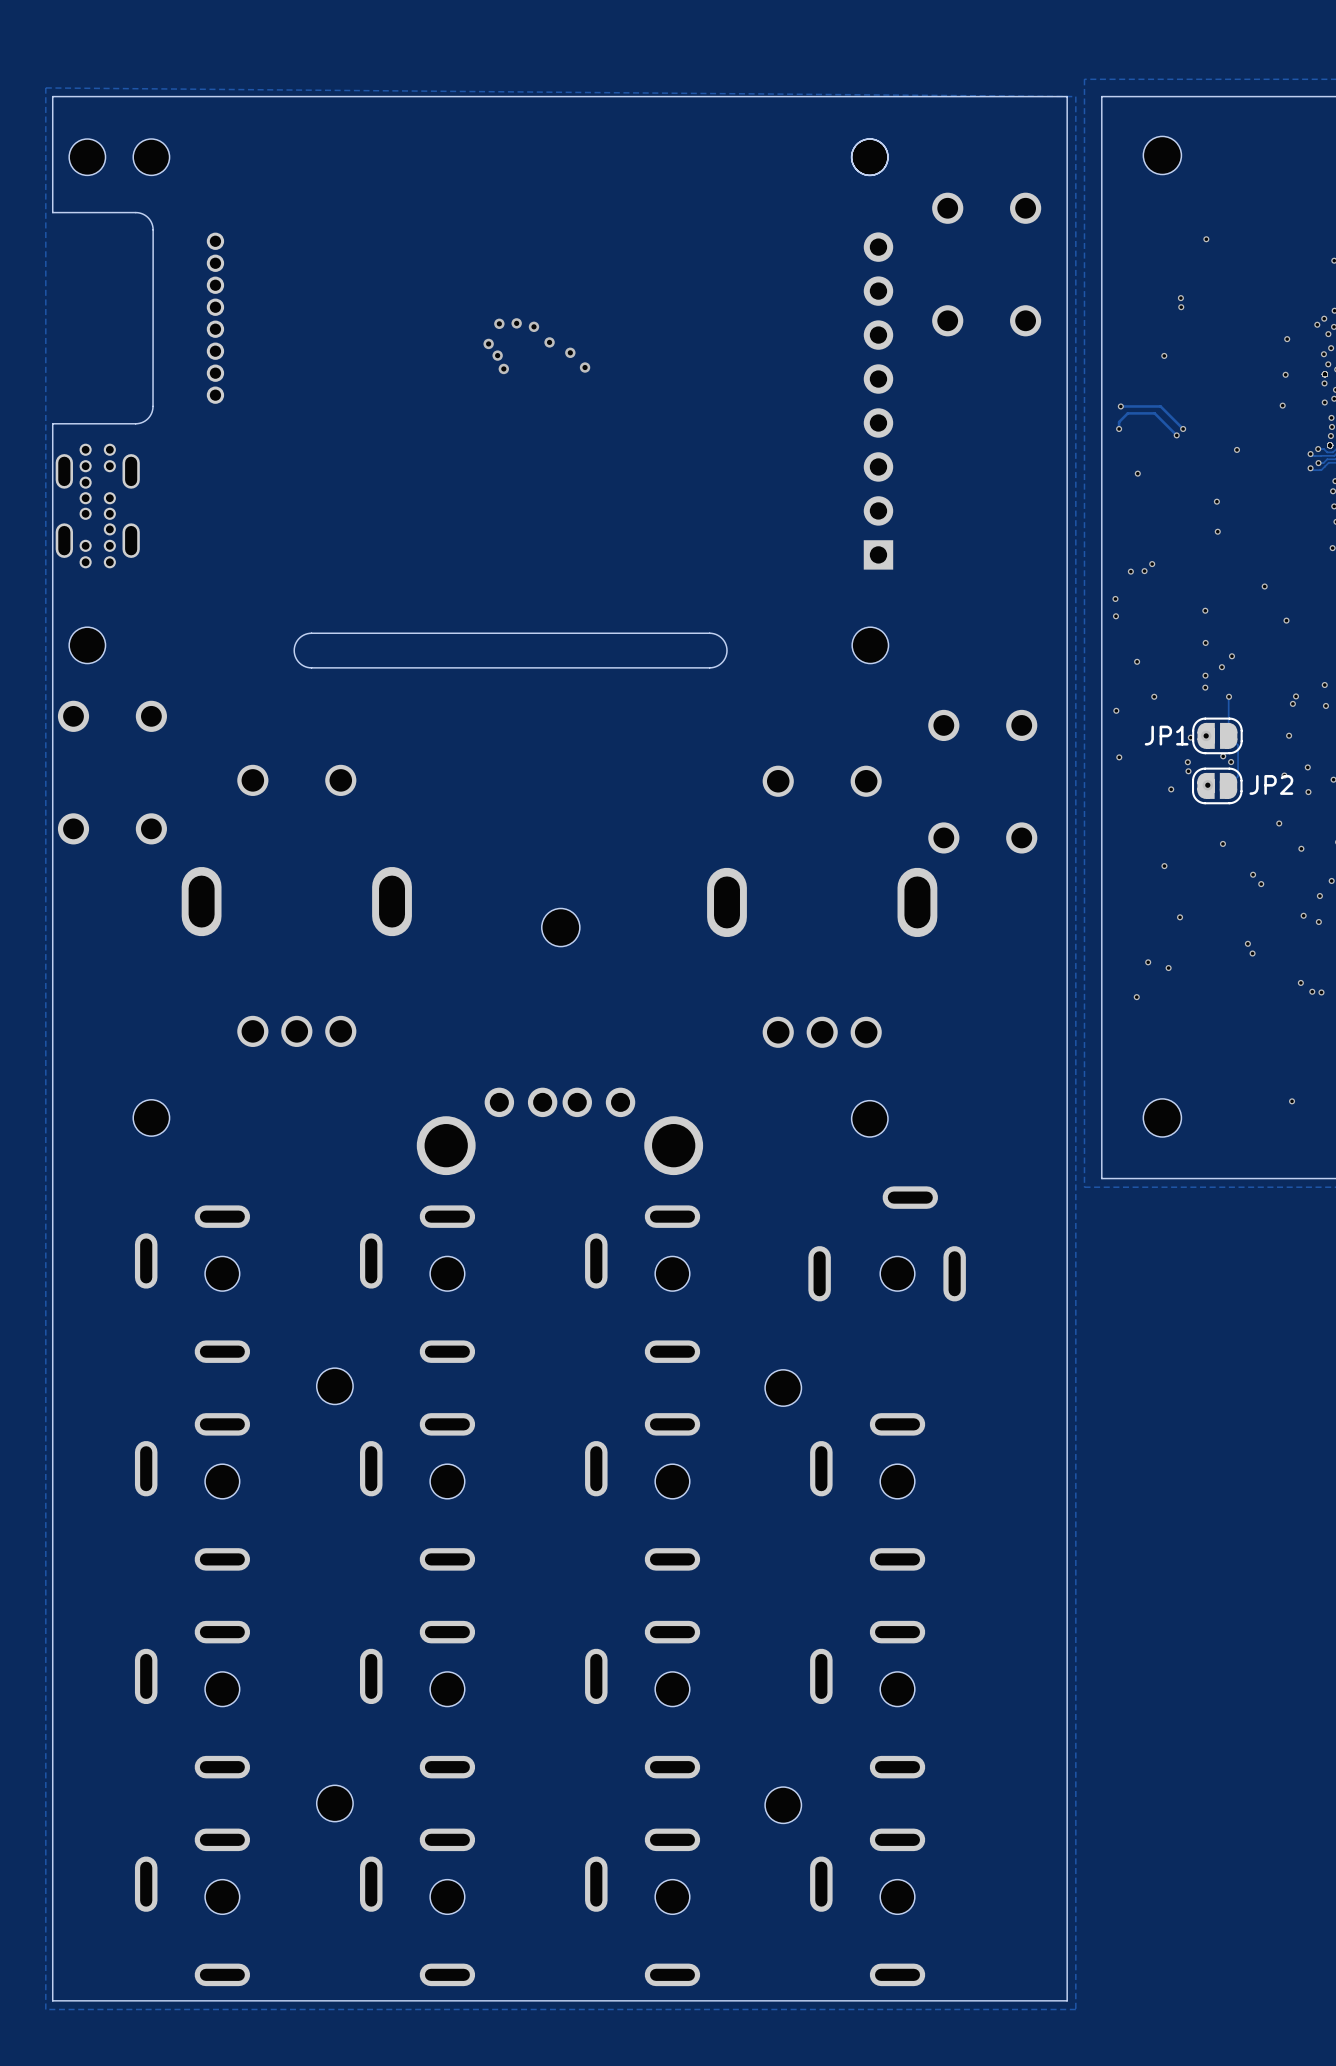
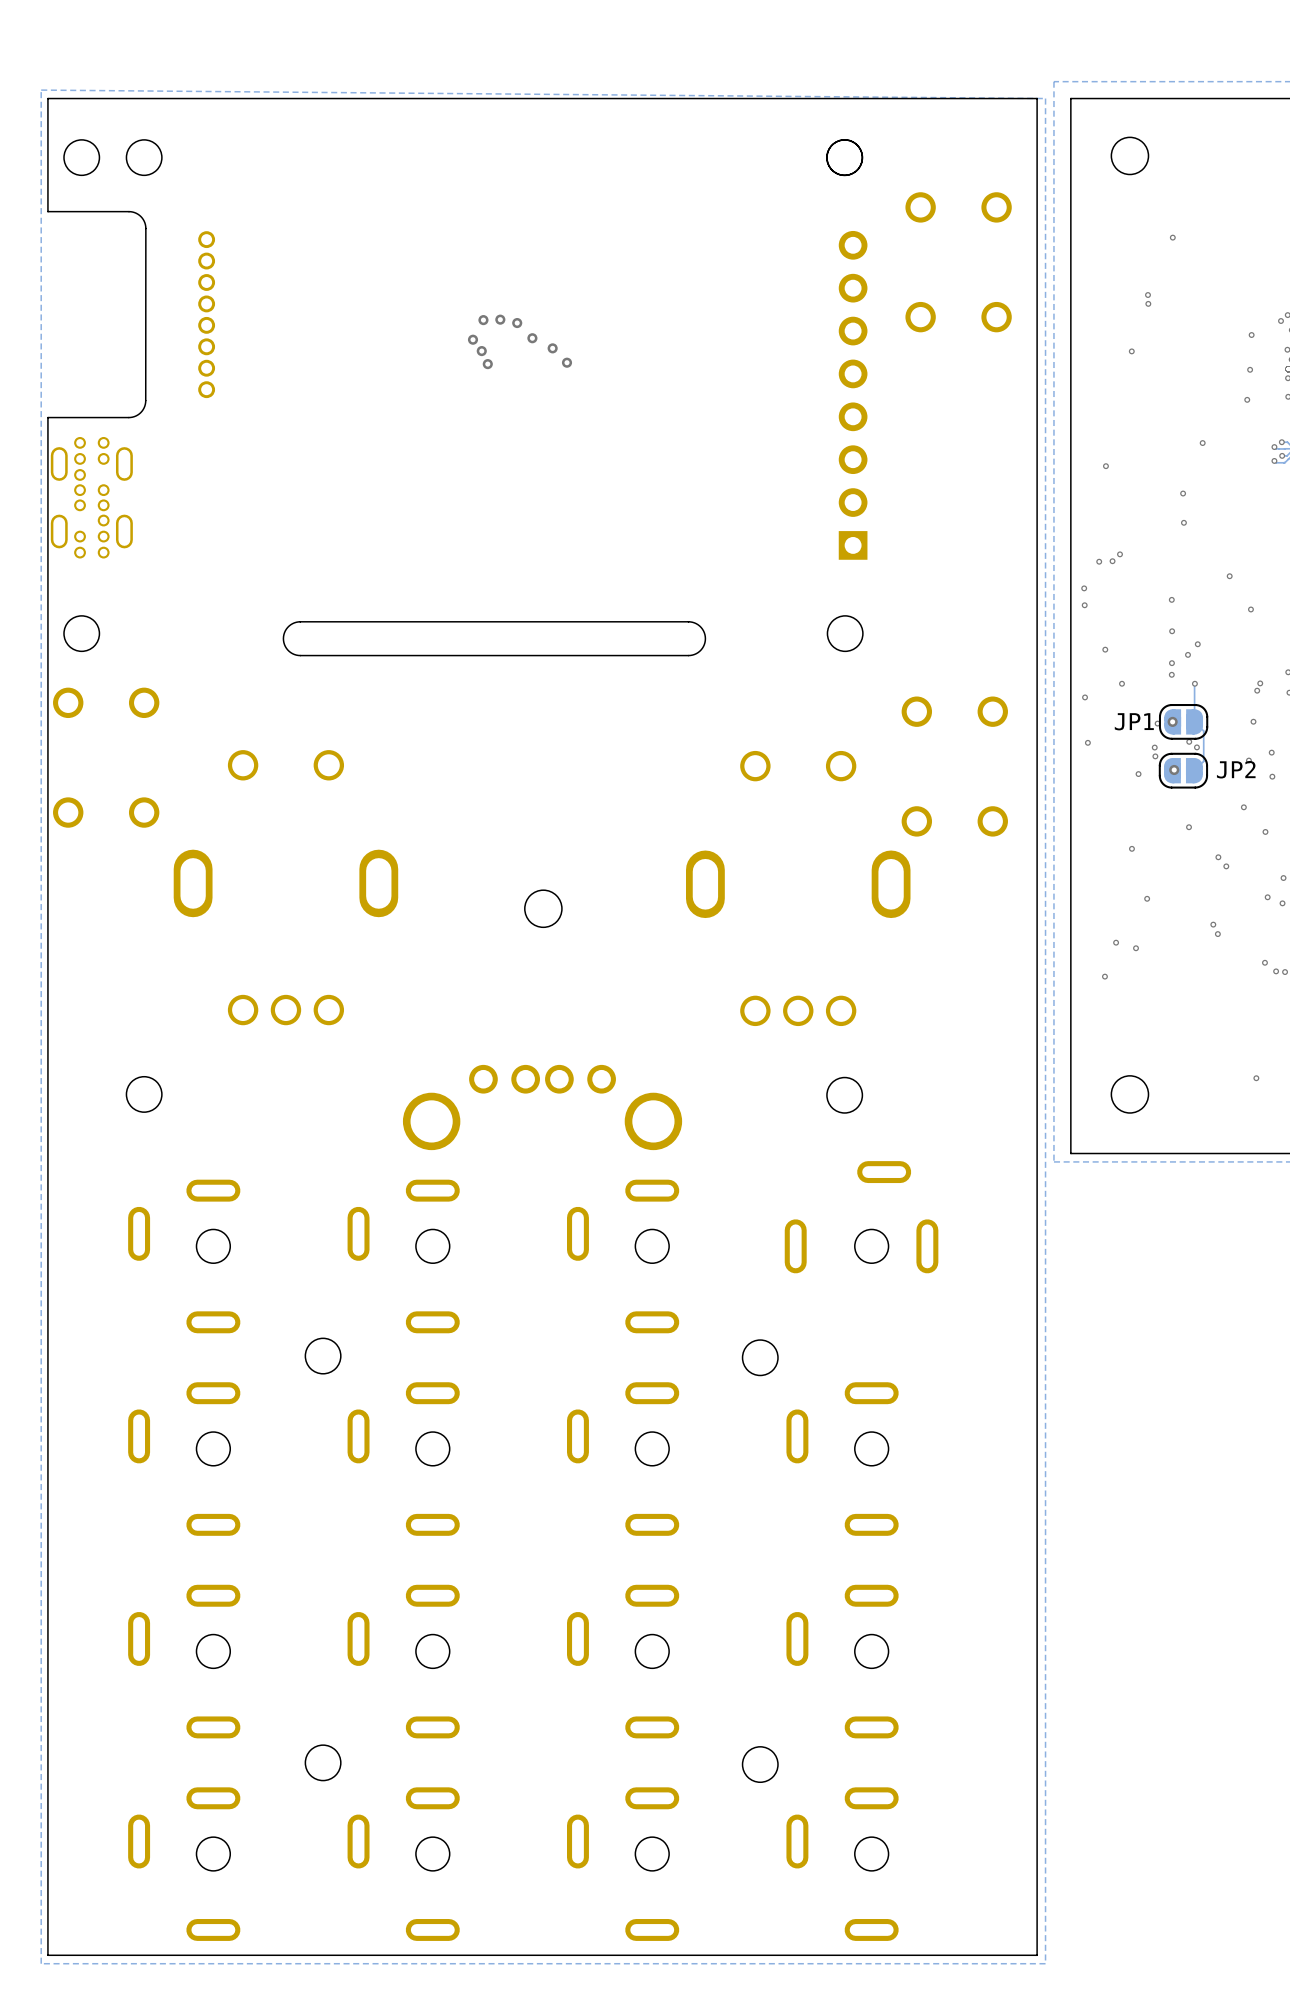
track: (1120, 406) (1160, 406) (1183, 428) -> none
via: (1120, 406) -> none
track: (1119, 428) (1119, 422) (1127, 413) (1154, 413) (1176, 435) -> none
via: (1119, 428) -> none
via: (1183, 428) -> none
via: (1176, 435) -> none

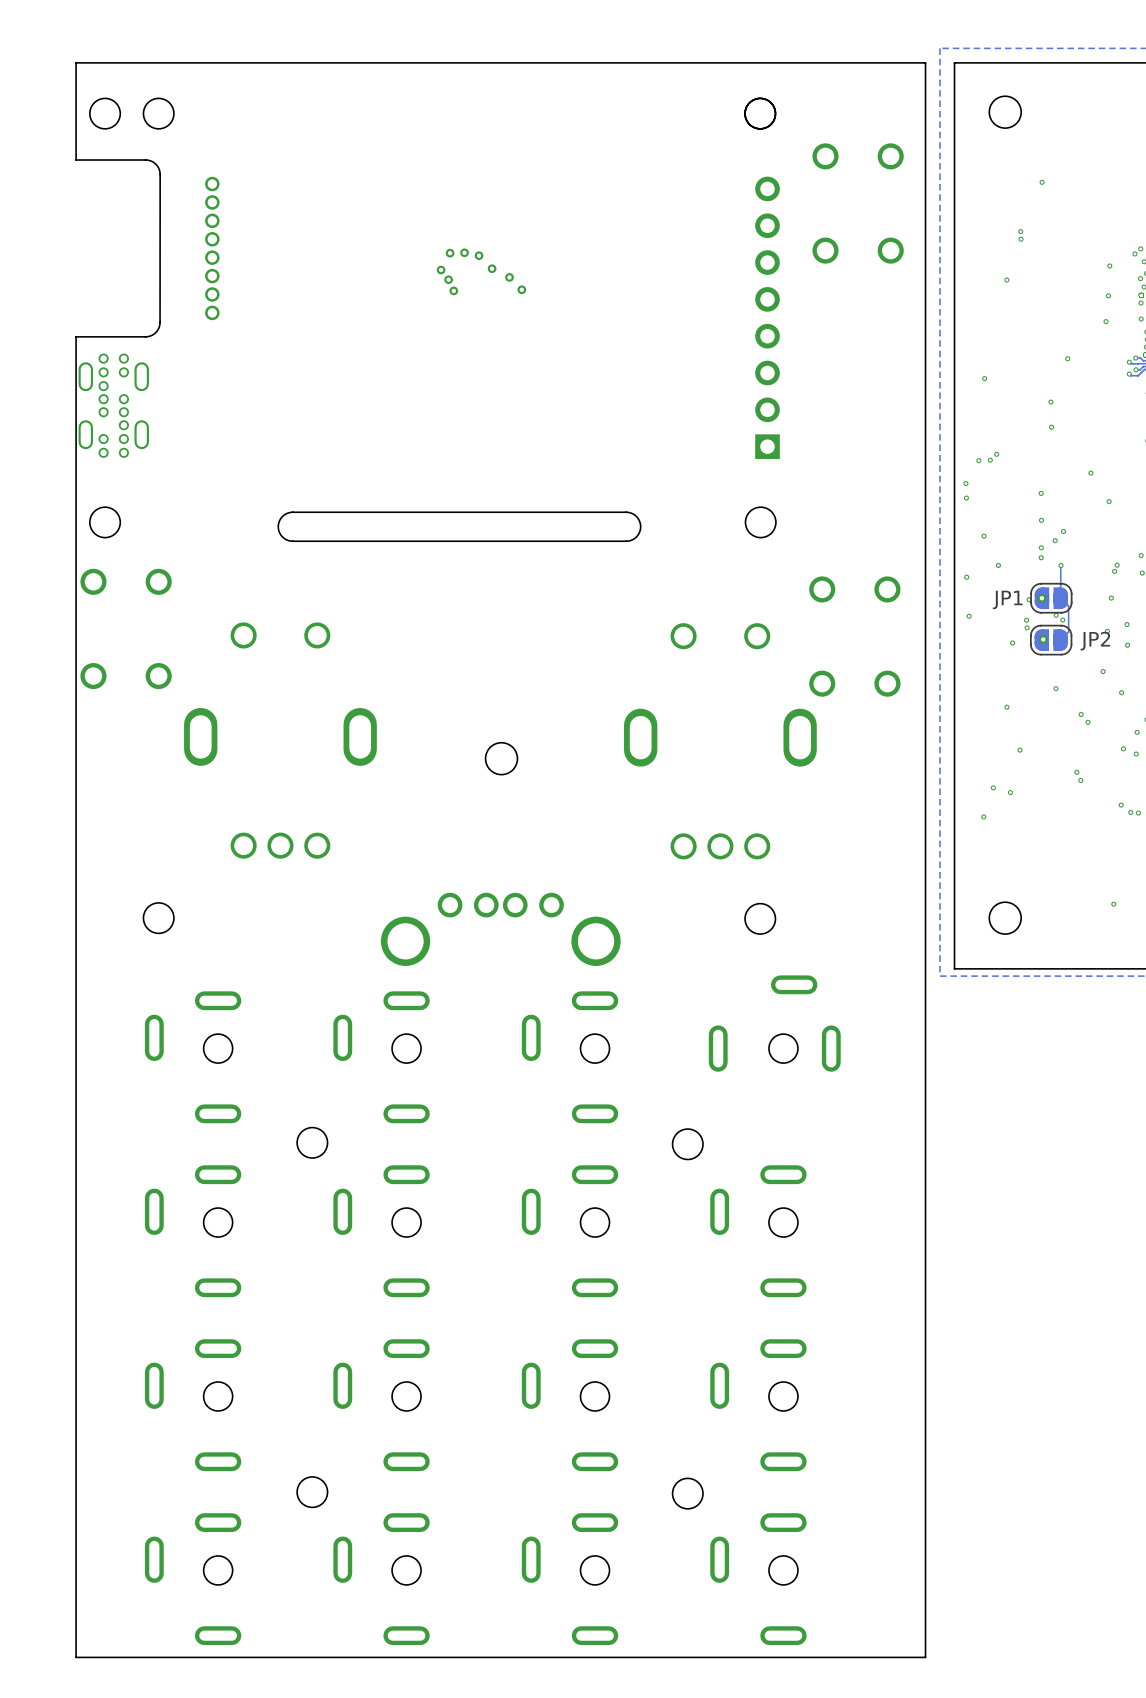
zone outline: (41, 90) (41, 1963) (1045, 1963) (1045, 98) (41, 90) -> none

